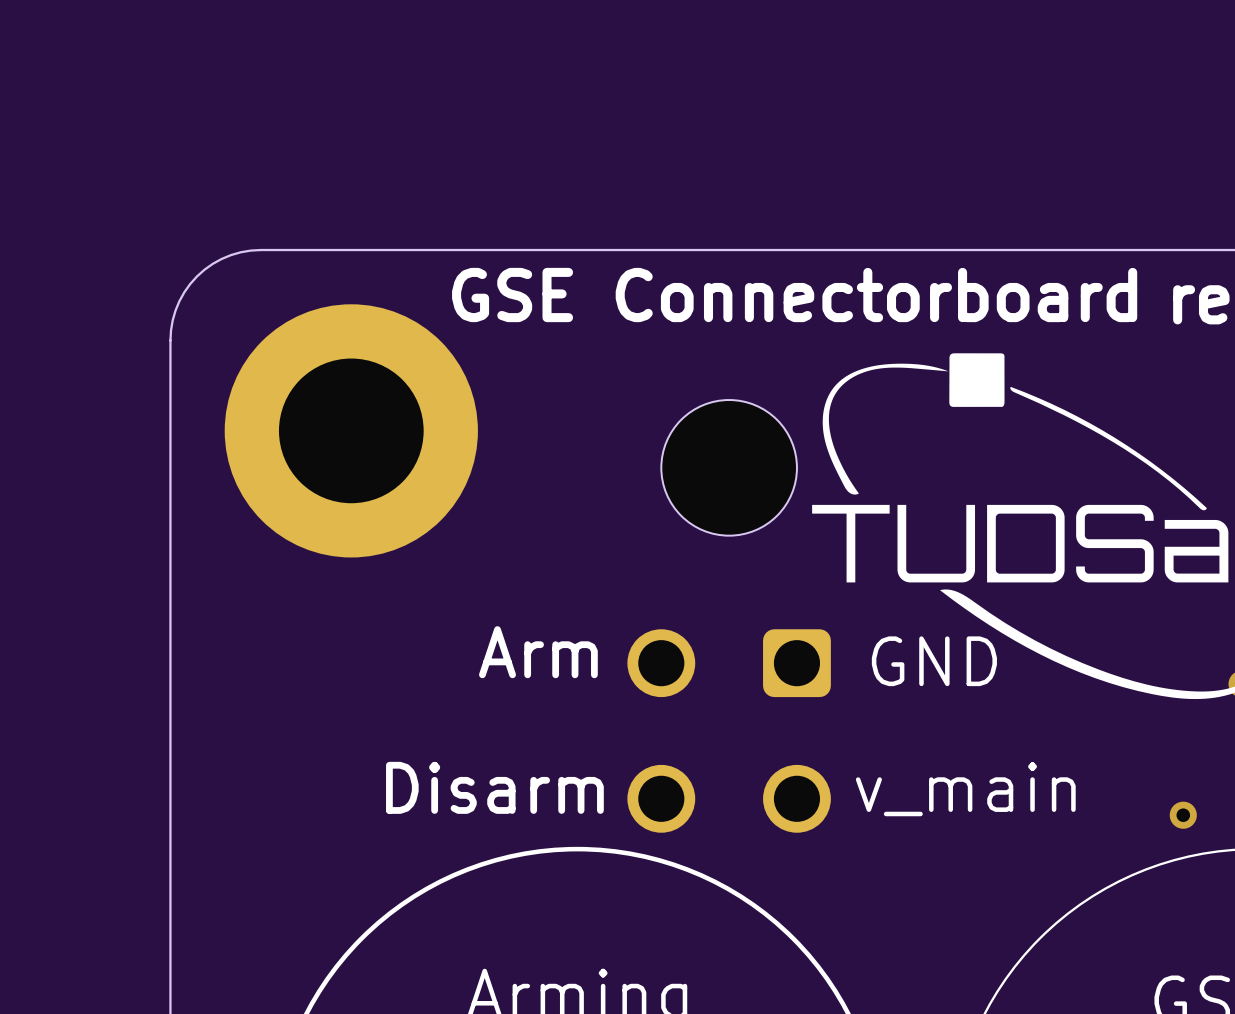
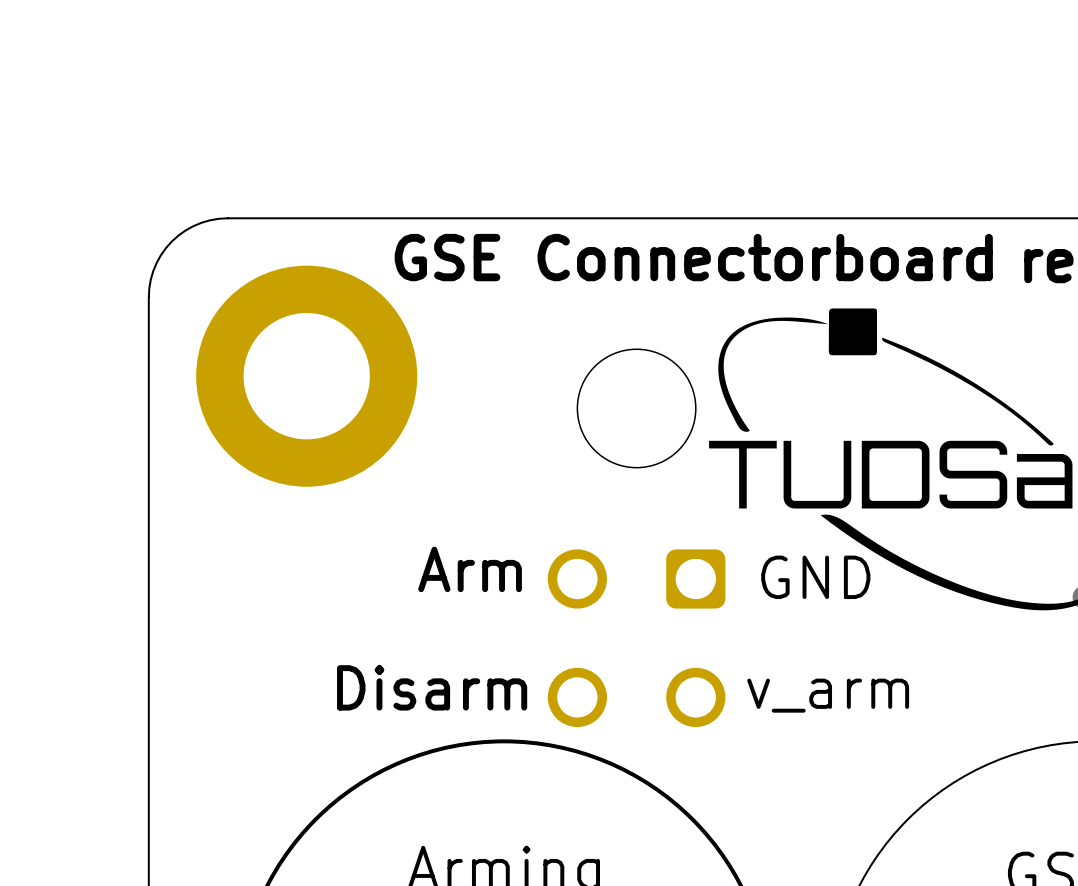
text: v_main (965, 789) -> v_arm (828, 695)
via: (1183, 815) -> none

